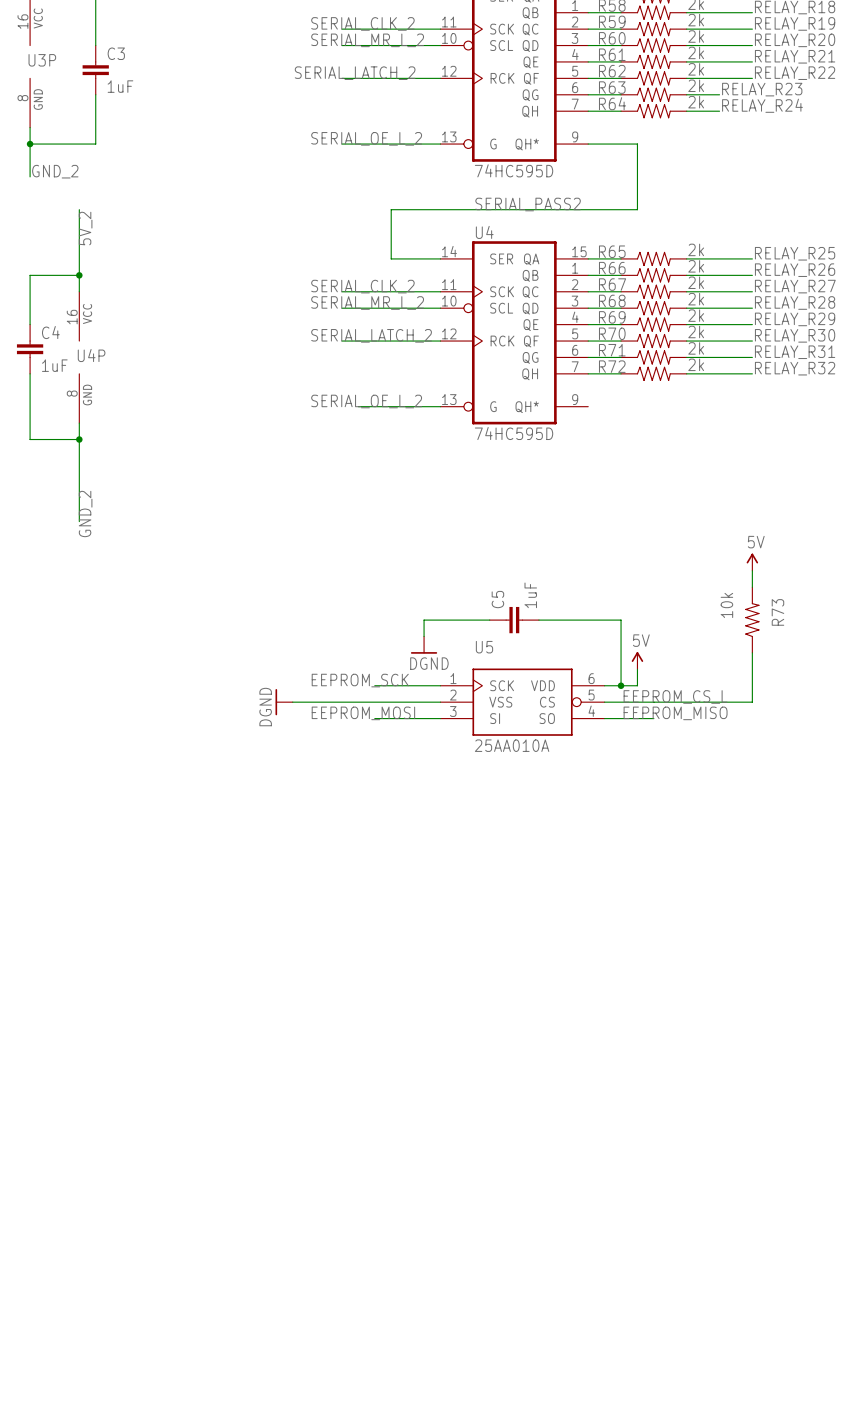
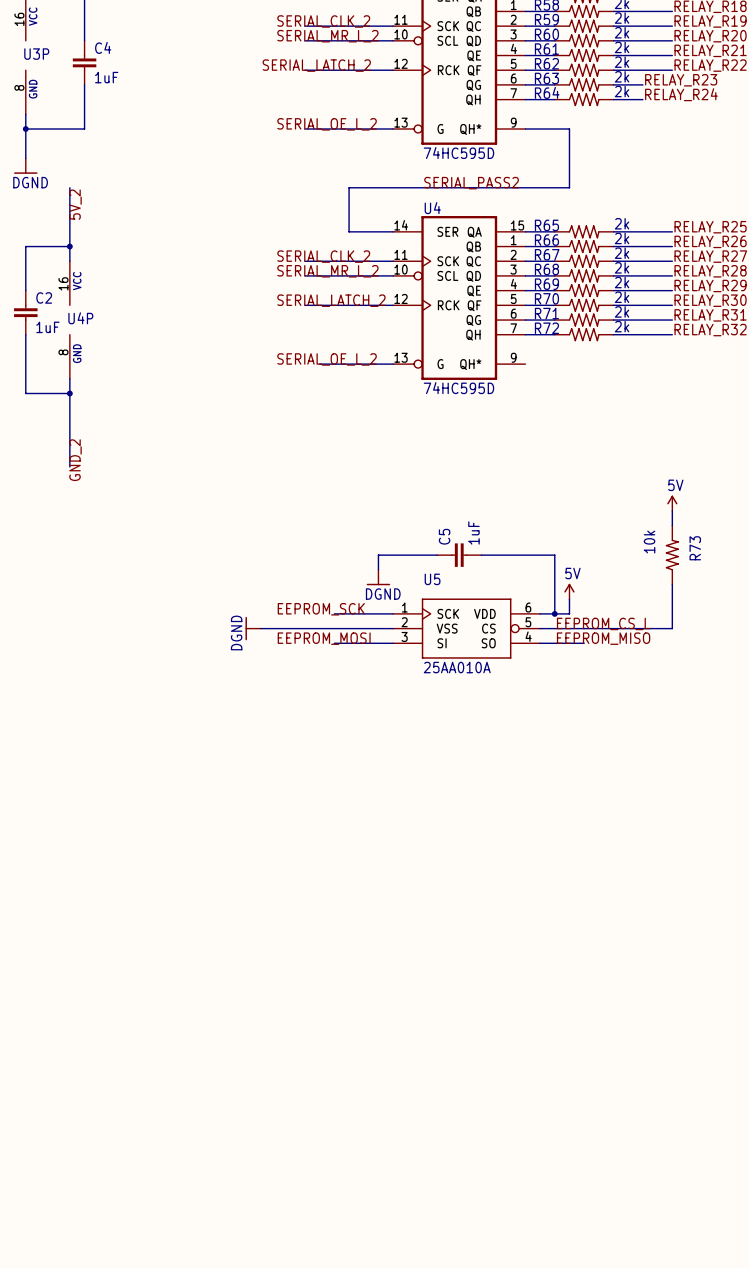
C3 name: C3 (116, 53) -> C4 (103, 47)
label: GND_2 (55, 171) -> none
power symbol: none -> DGND (25, 166)
C4 name: C4 (50, 332) -> C2 (44, 297)

